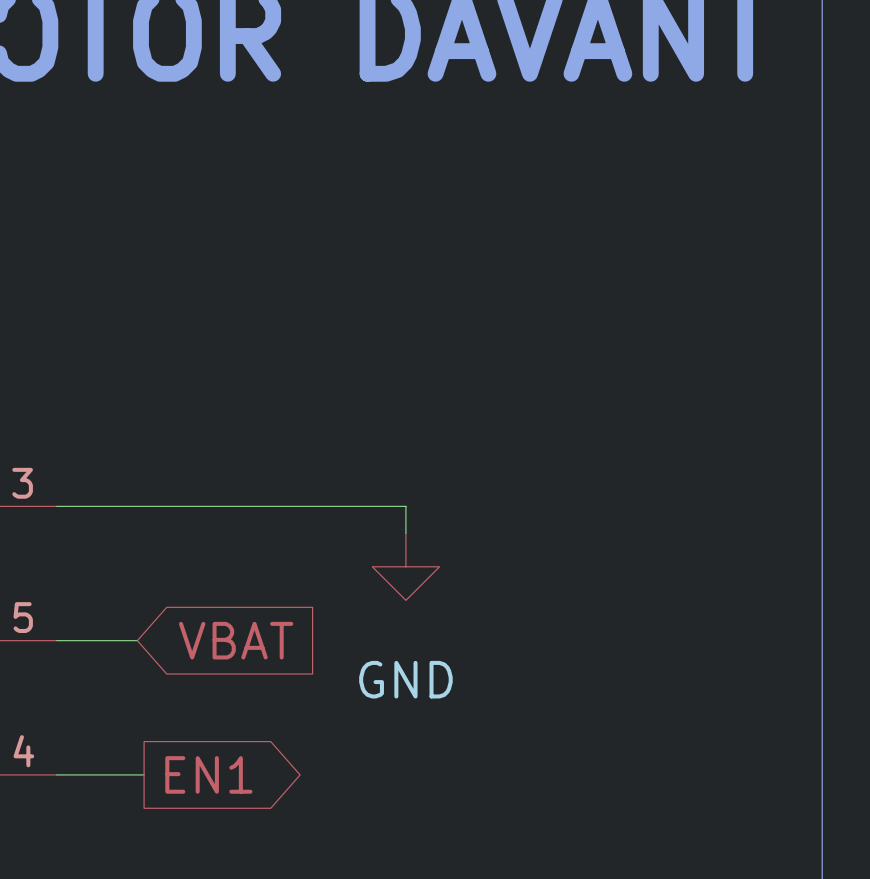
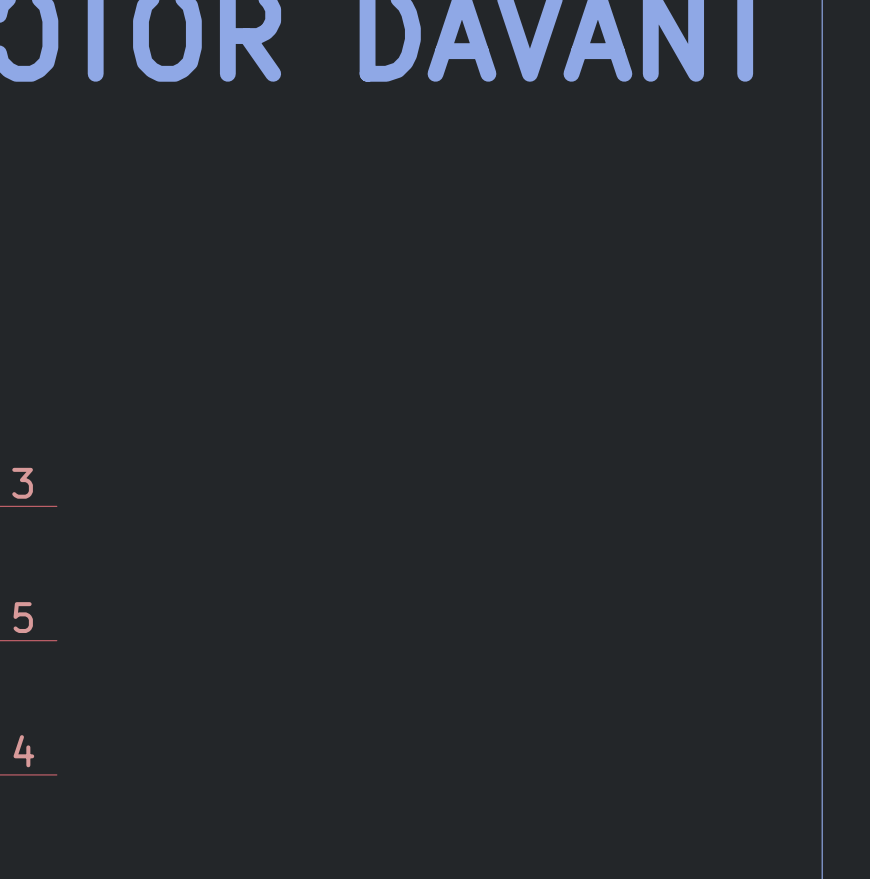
wire: (56, 506) (405, 506) (405, 533) -> none
power symbol: GND (405, 566) -> none
wire: (56, 640) (137, 640) -> none
global label: VBAT (236, 640) -> none
wire: (56, 774) (144, 774) -> none
global label: EN1 (208, 774) -> none

